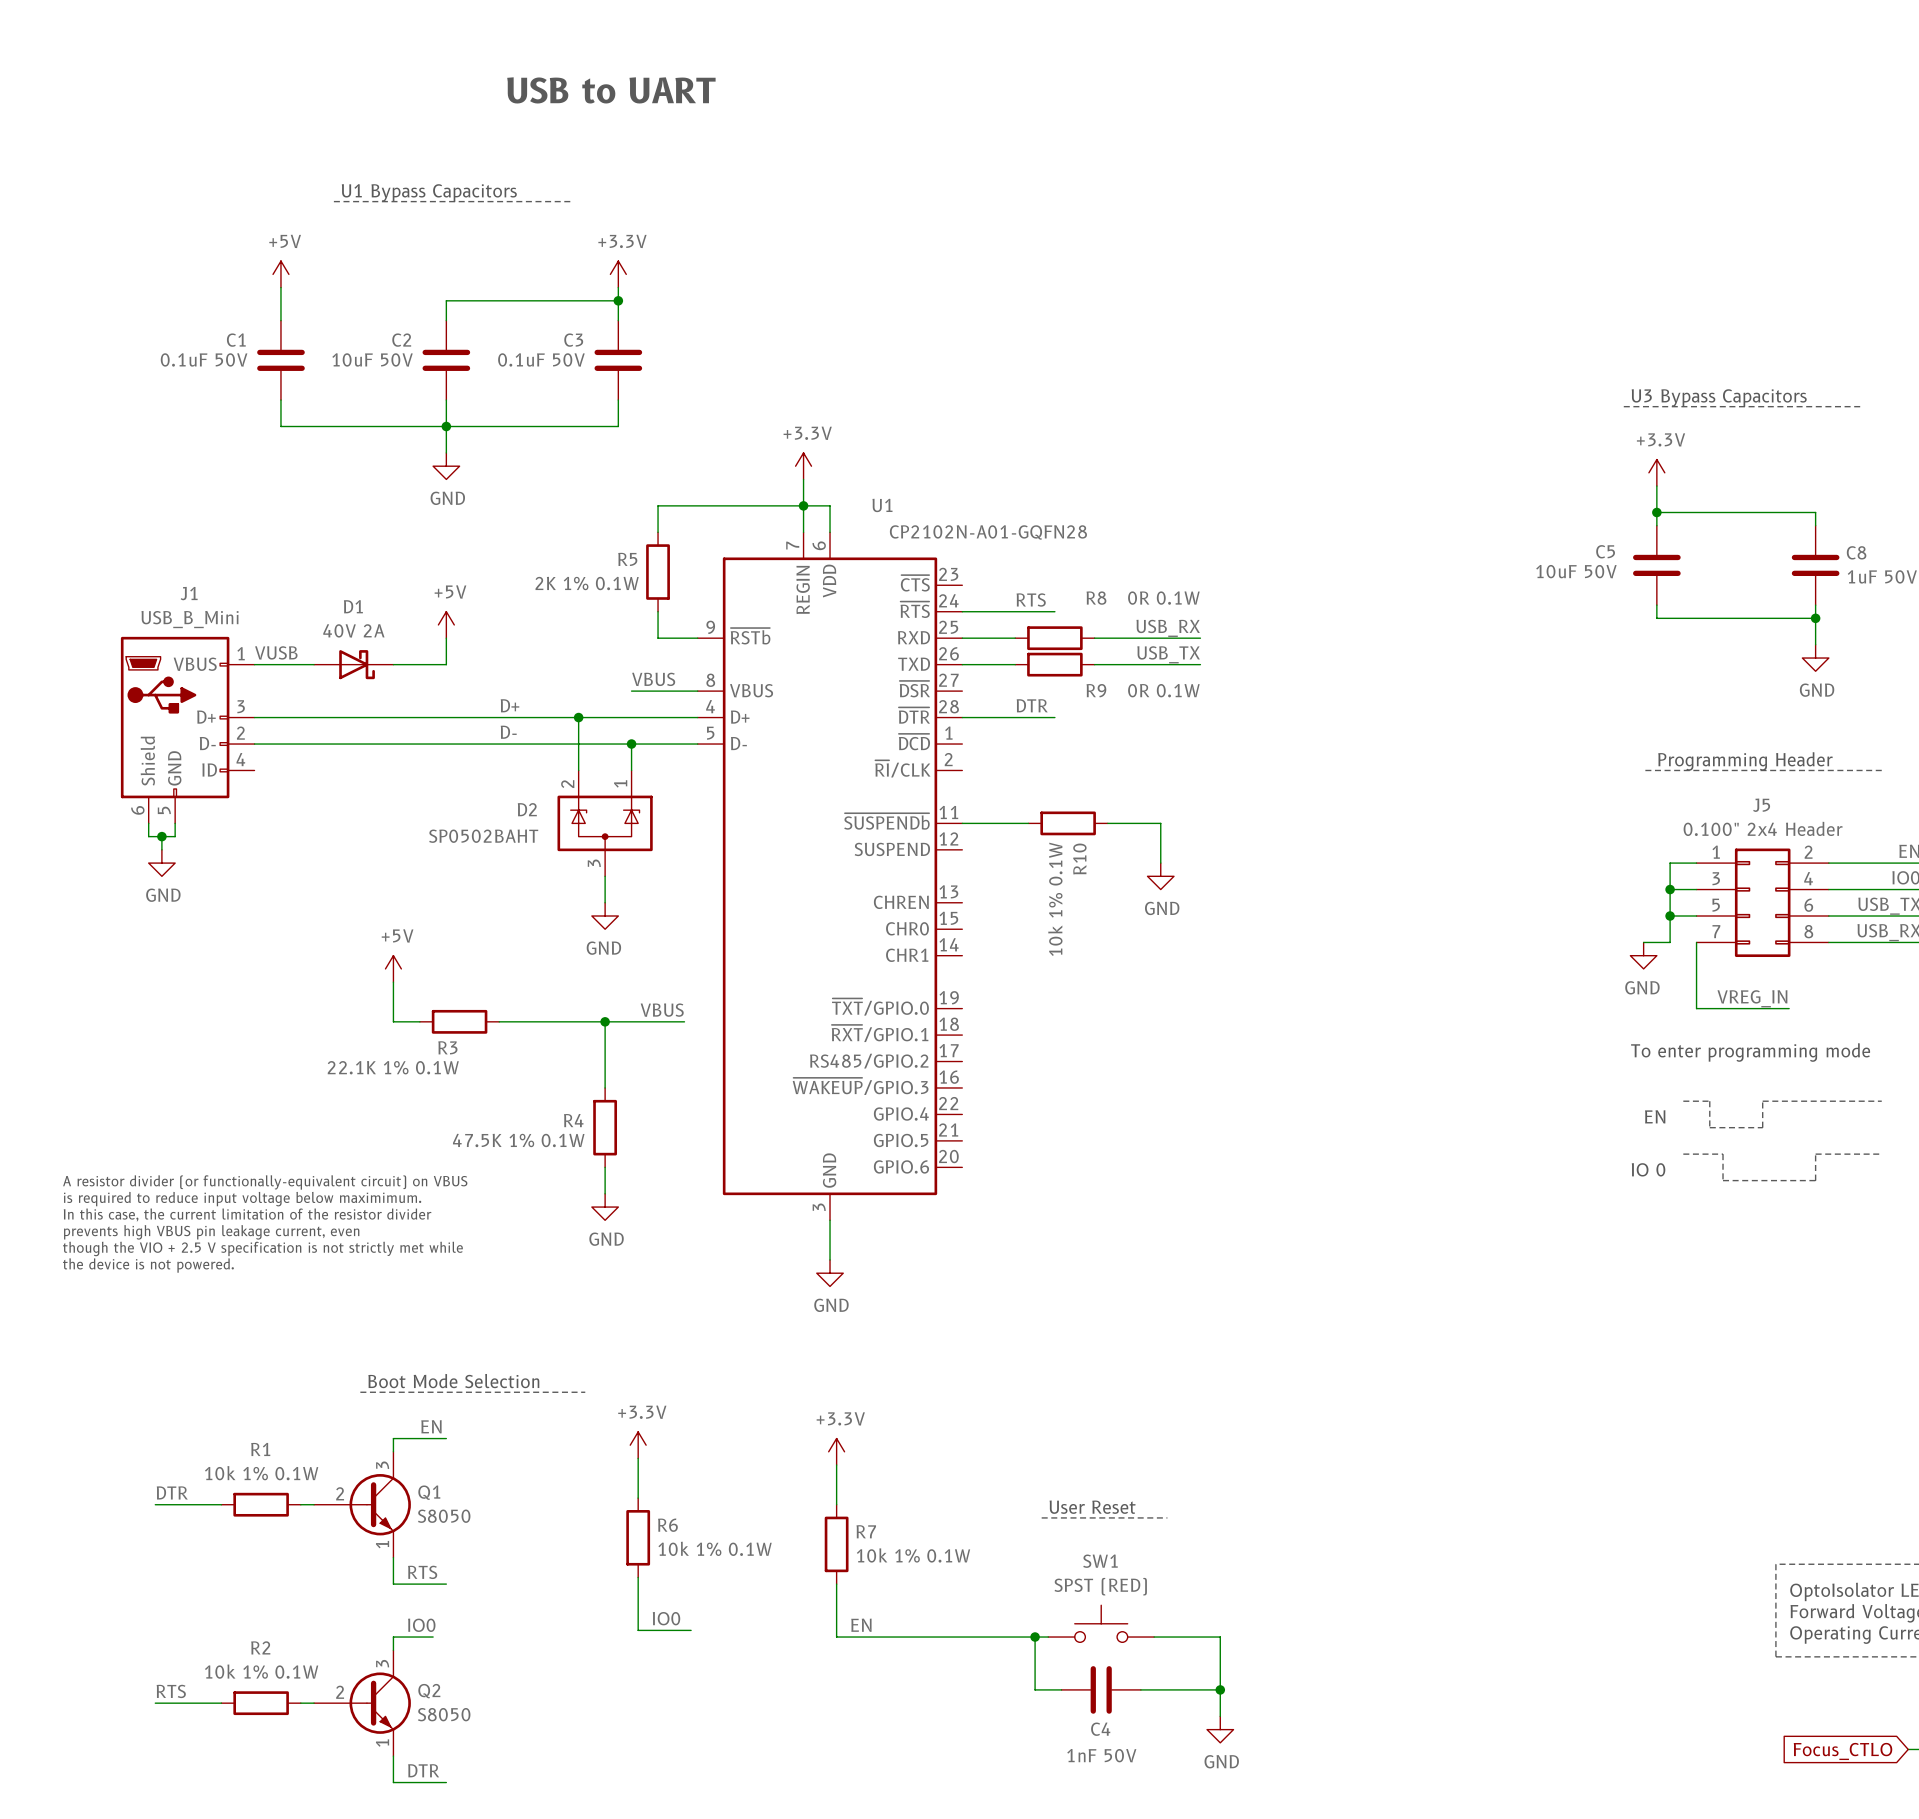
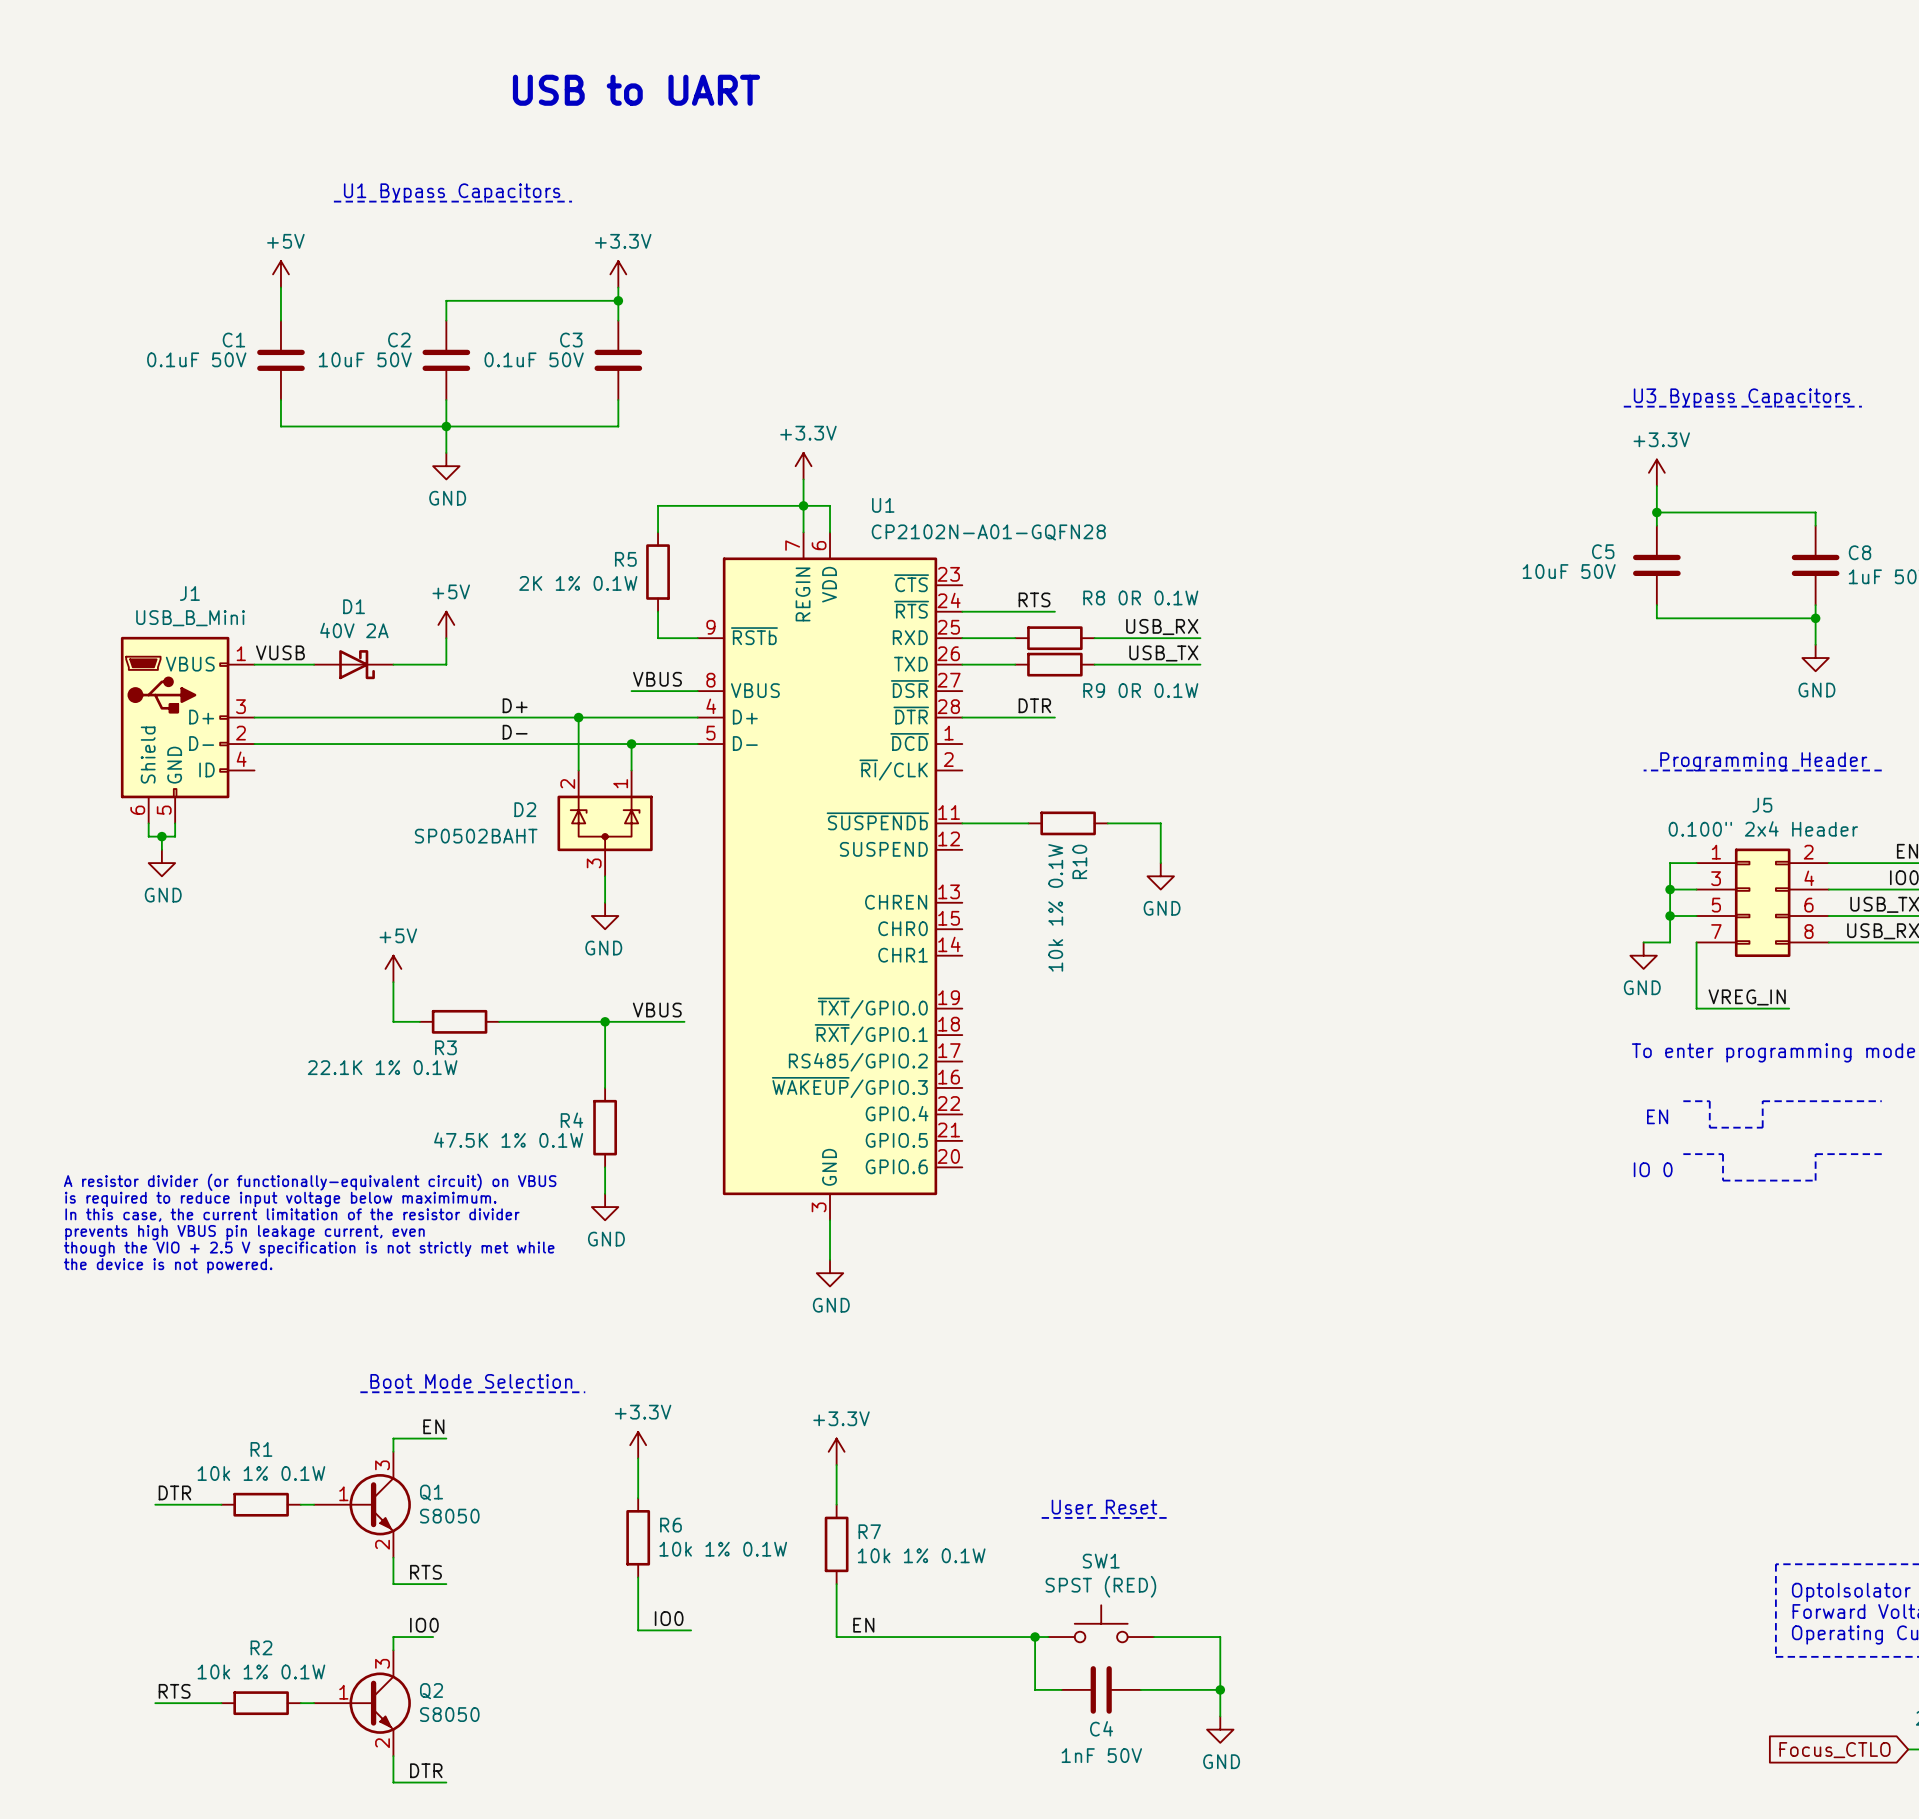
Q1 symbol: [314, 1451, 411, 1558] -> [314, 1451, 411, 1558]
Q2 symbol: [314, 1650, 411, 1757] -> [314, 1650, 411, 1757]

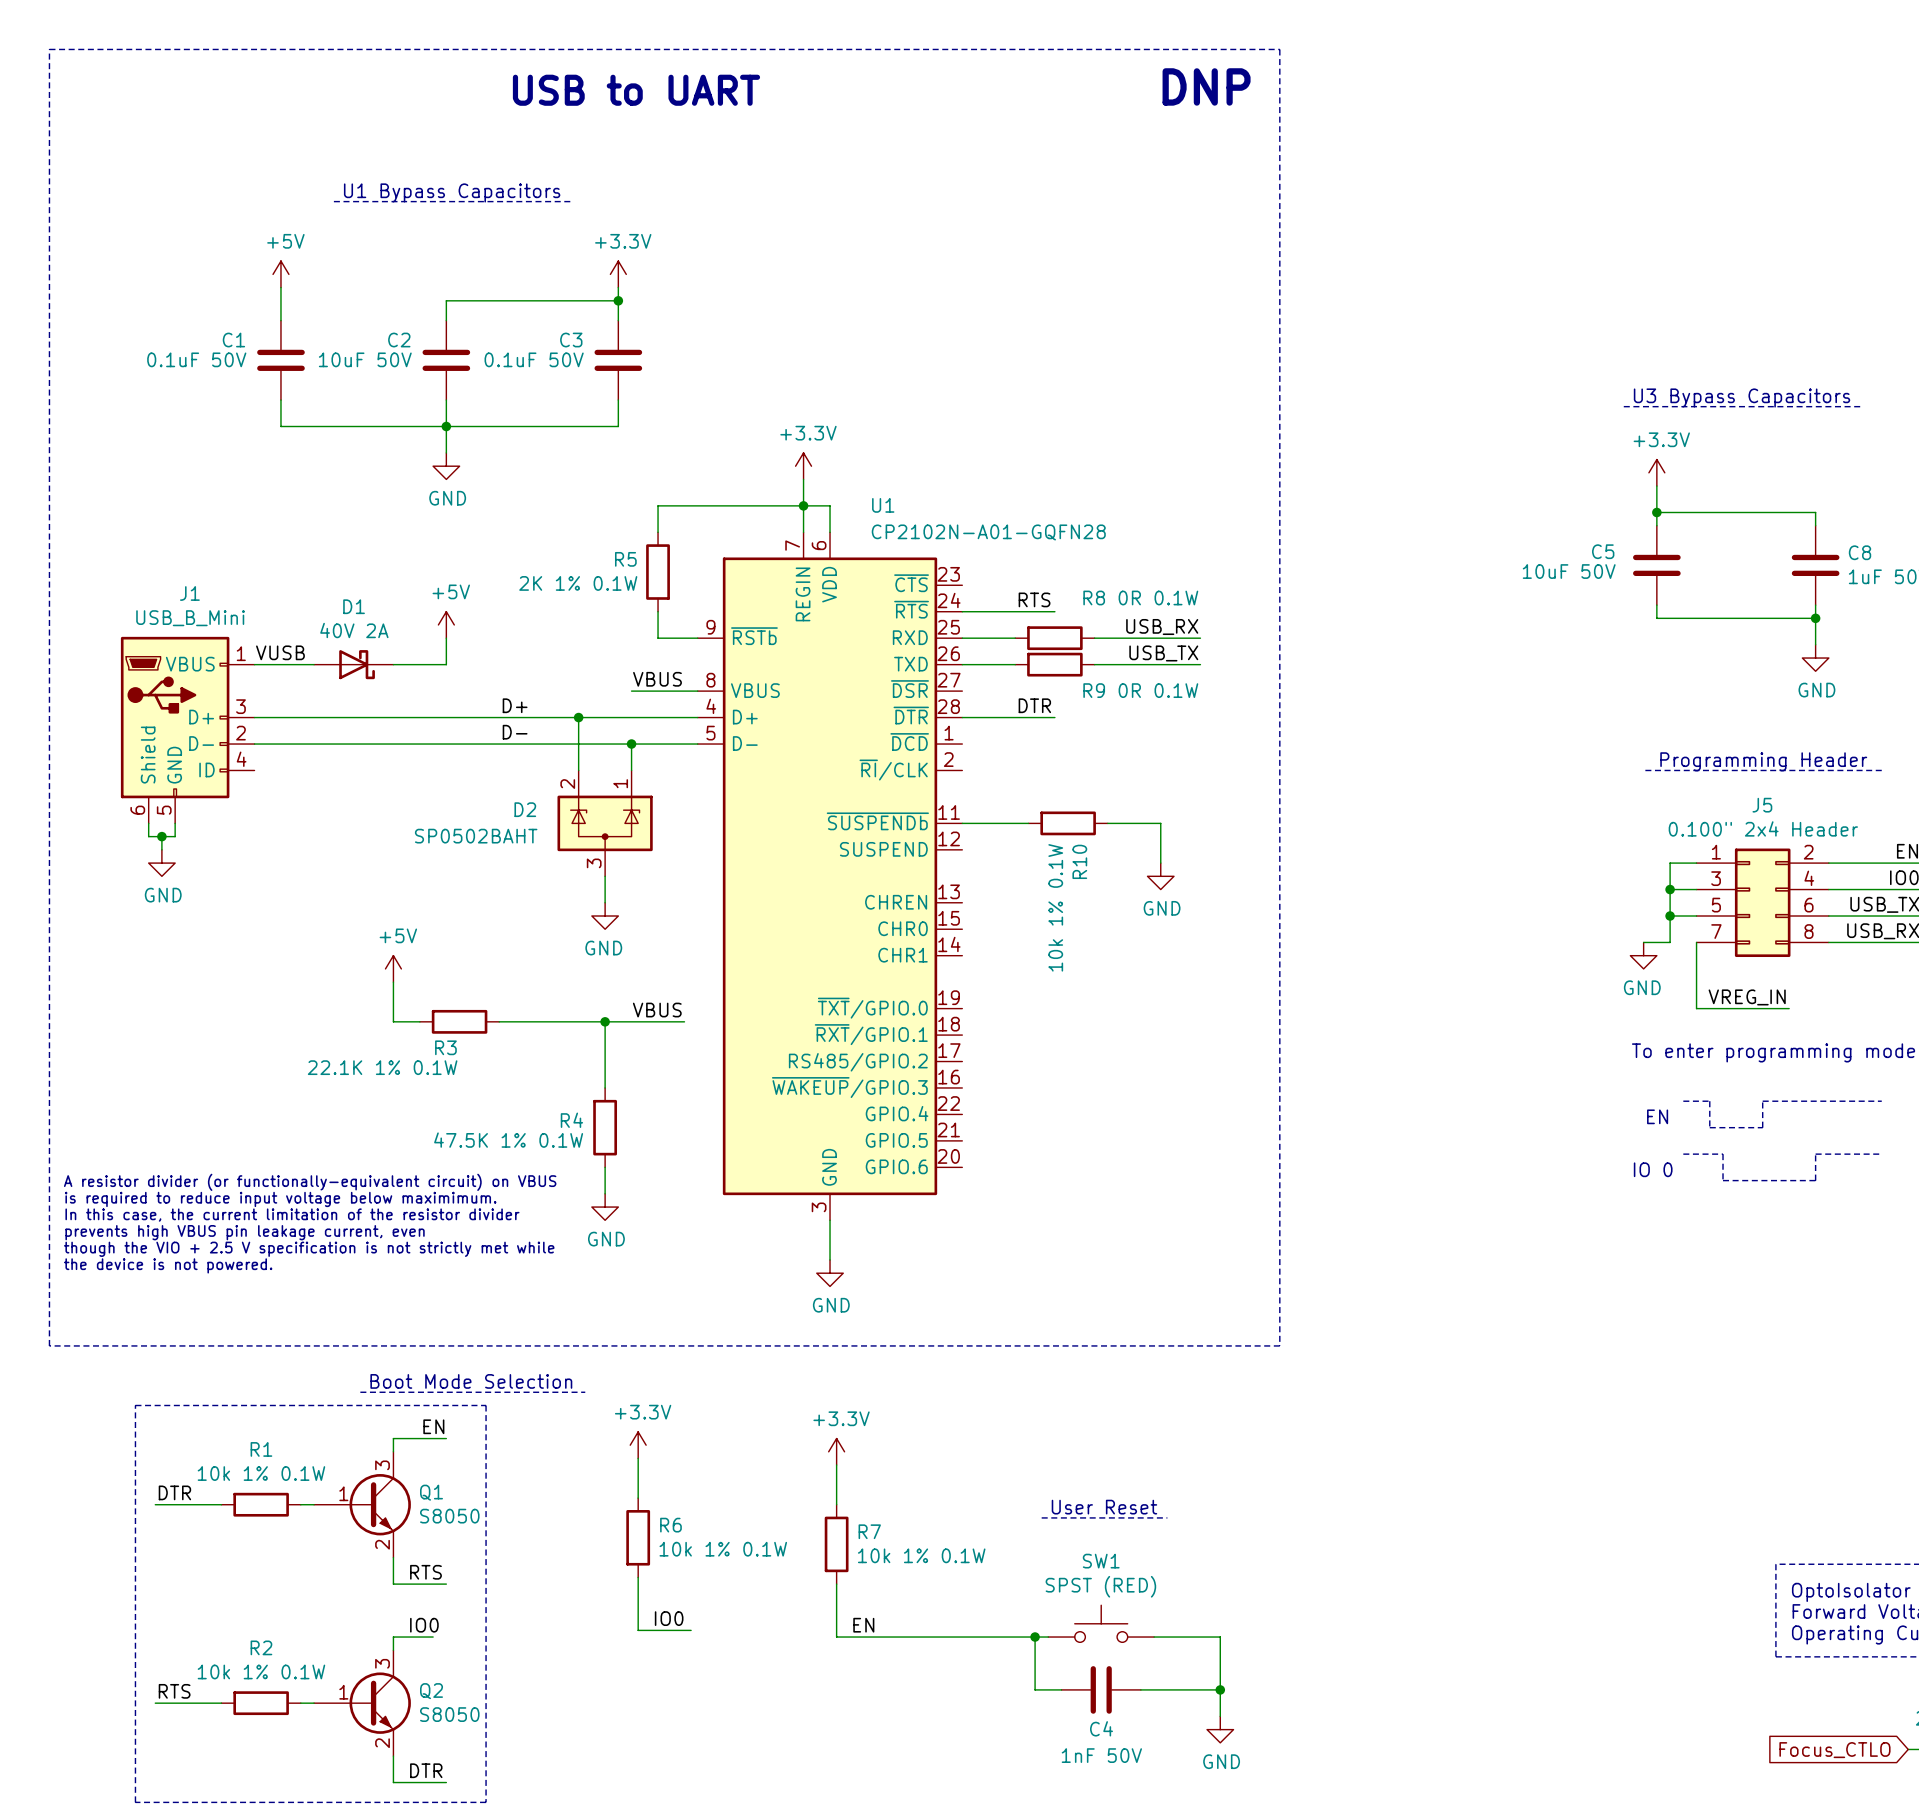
line: none -> (49, 49) (1279, 49) (1279, 1345) (49, 1345) (49, 49)
text: none -> DNP (1206, 86)
line: none -> (135, 1405) (135, 1802) (486, 1802) (486, 1405) (135, 1405)

